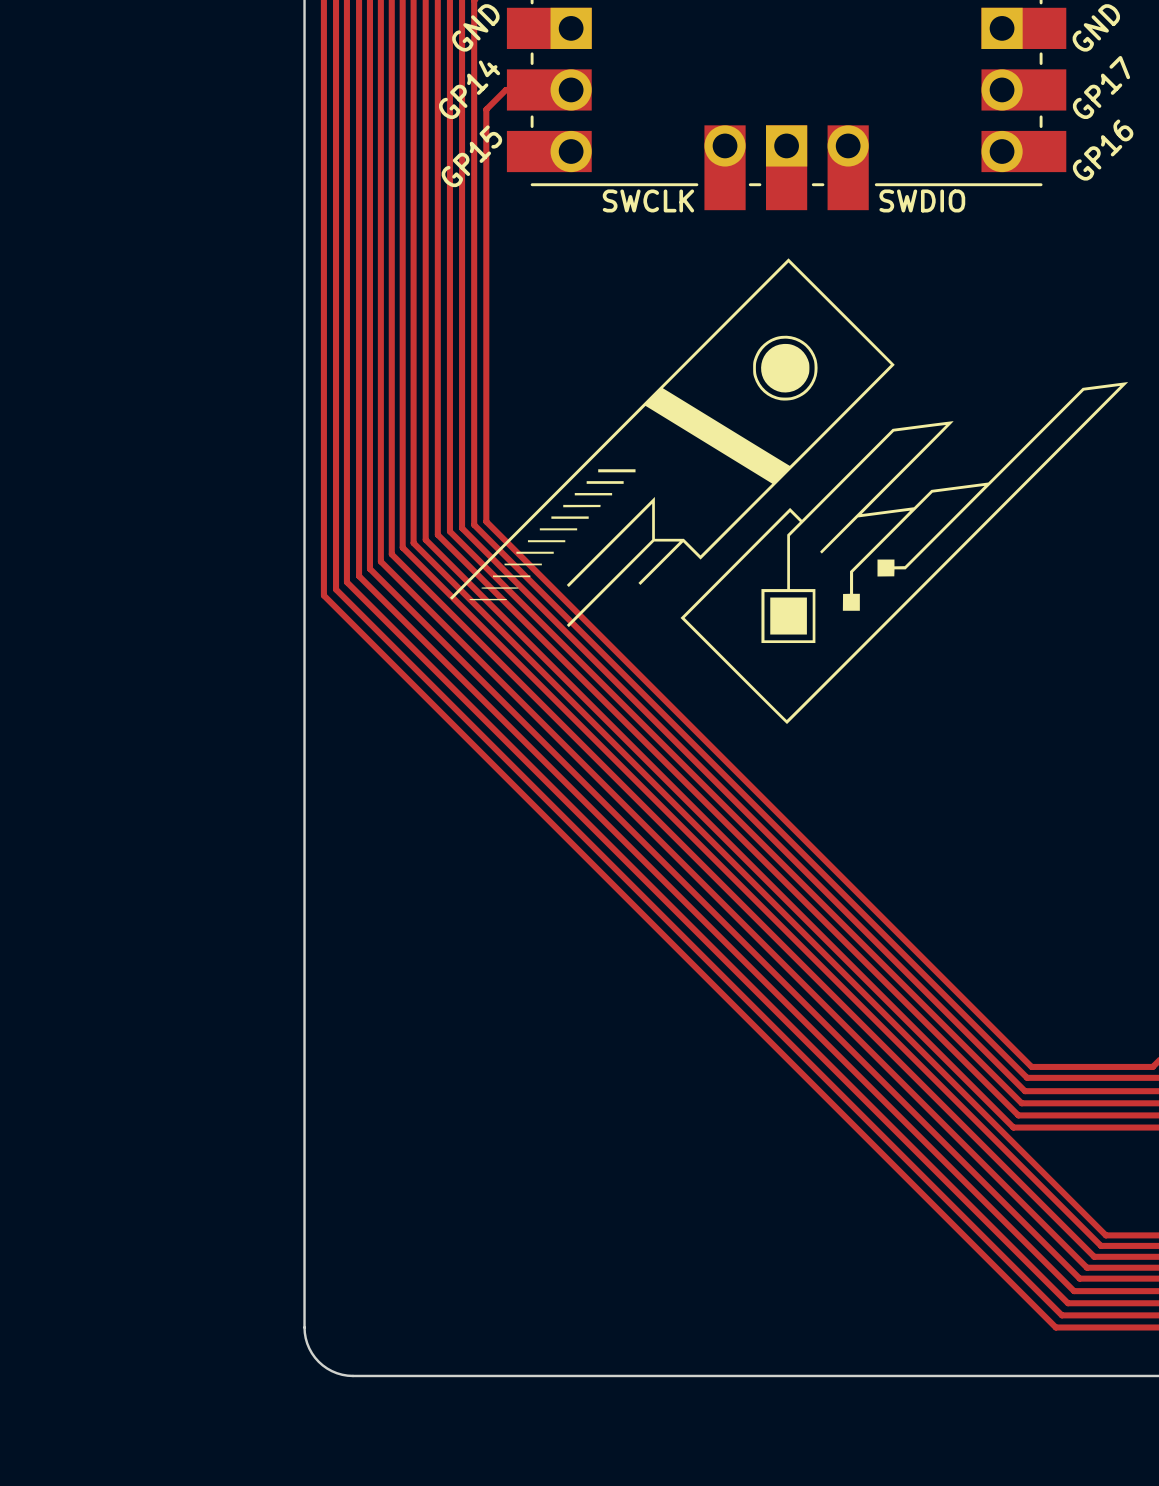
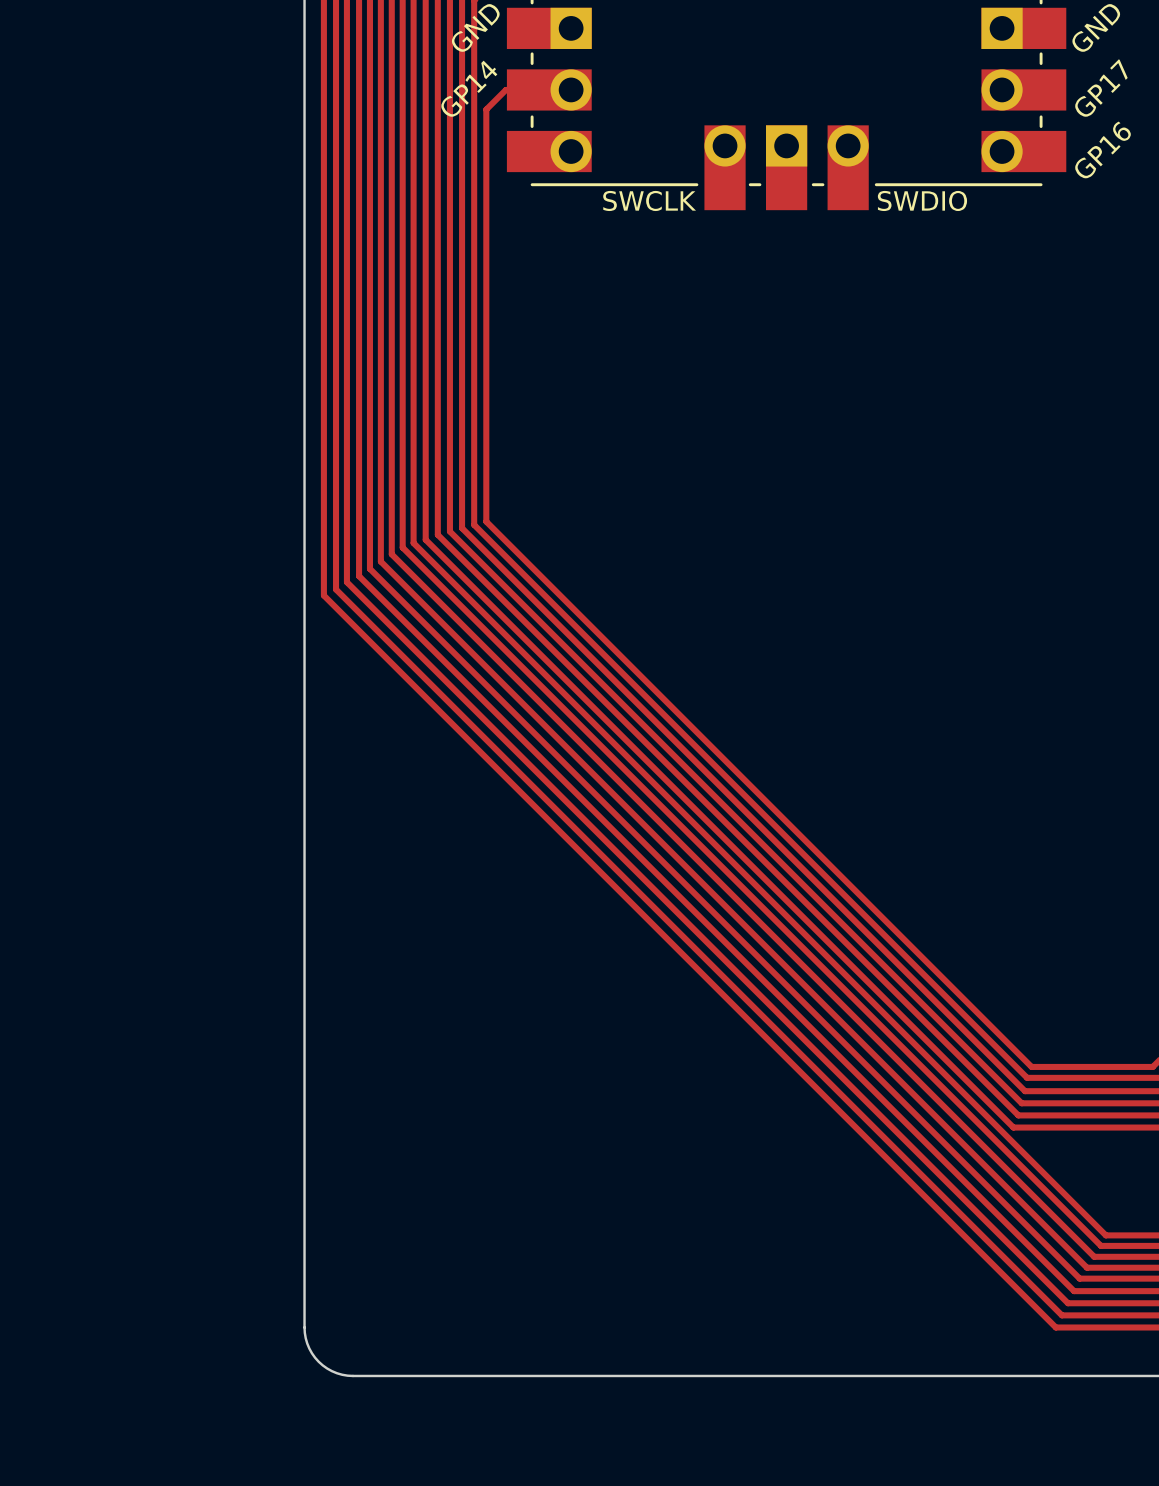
text: GP15 (471, 156) -> none
drawing: [449, 258, 1129, 725] -> none

